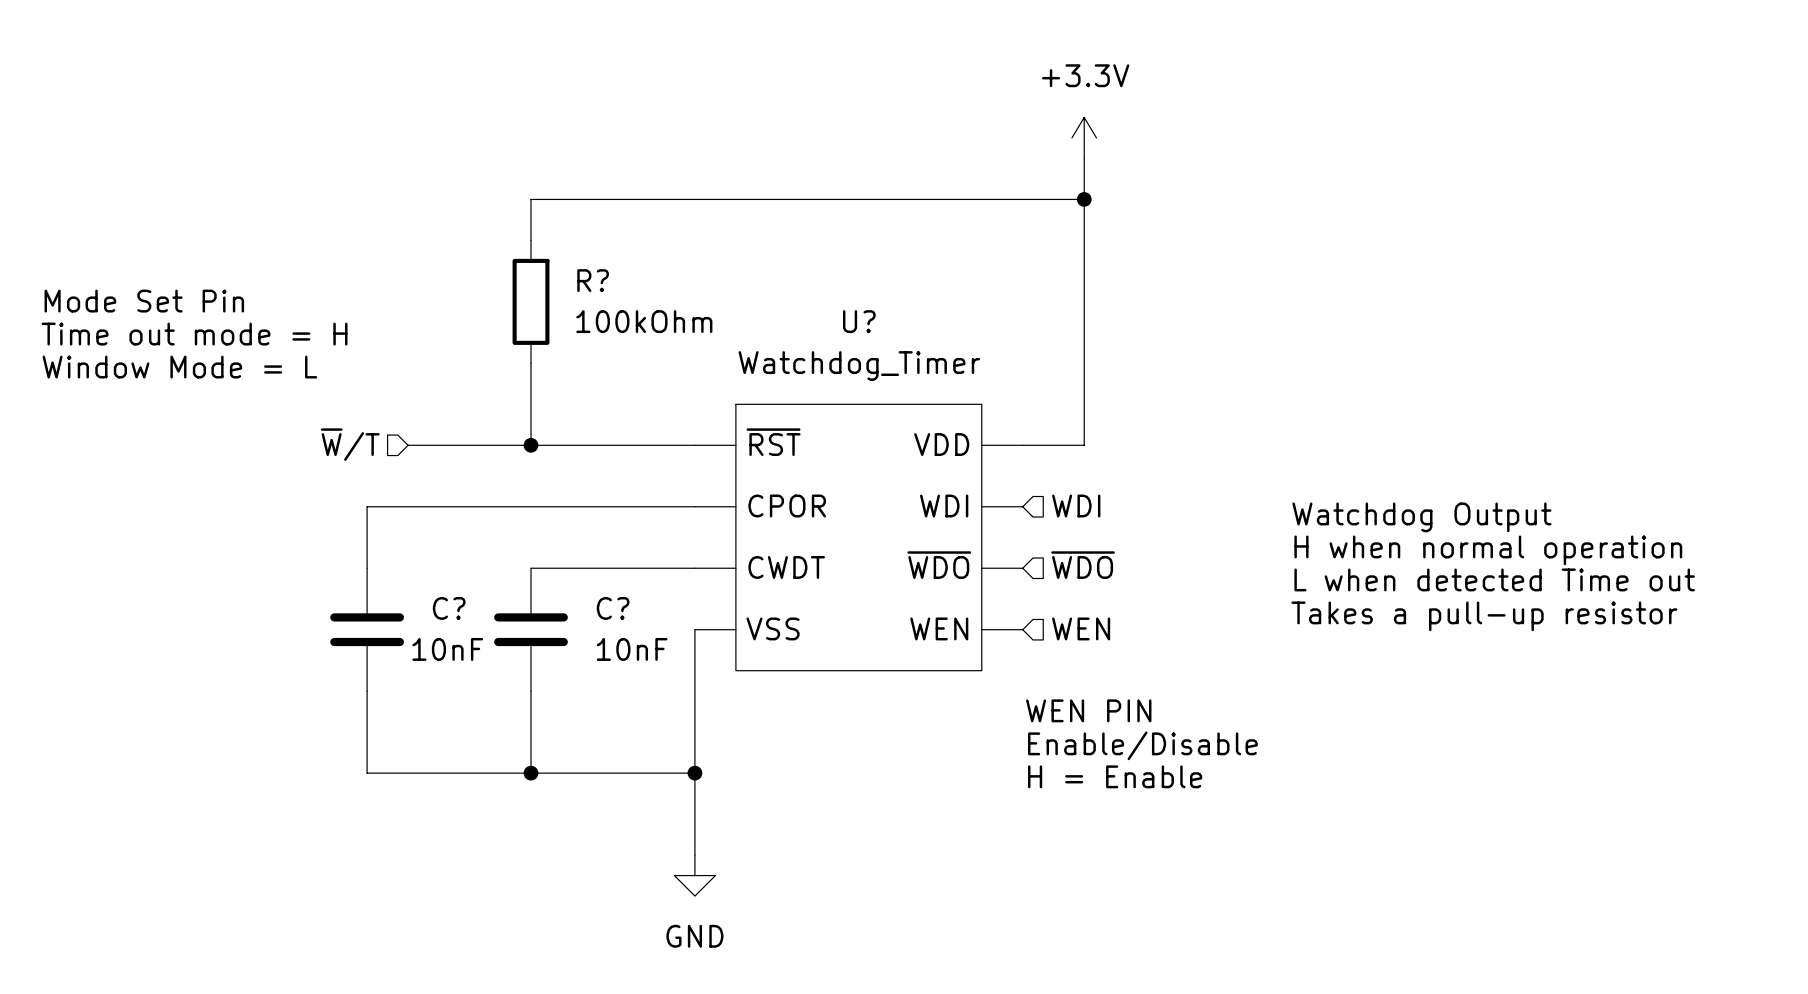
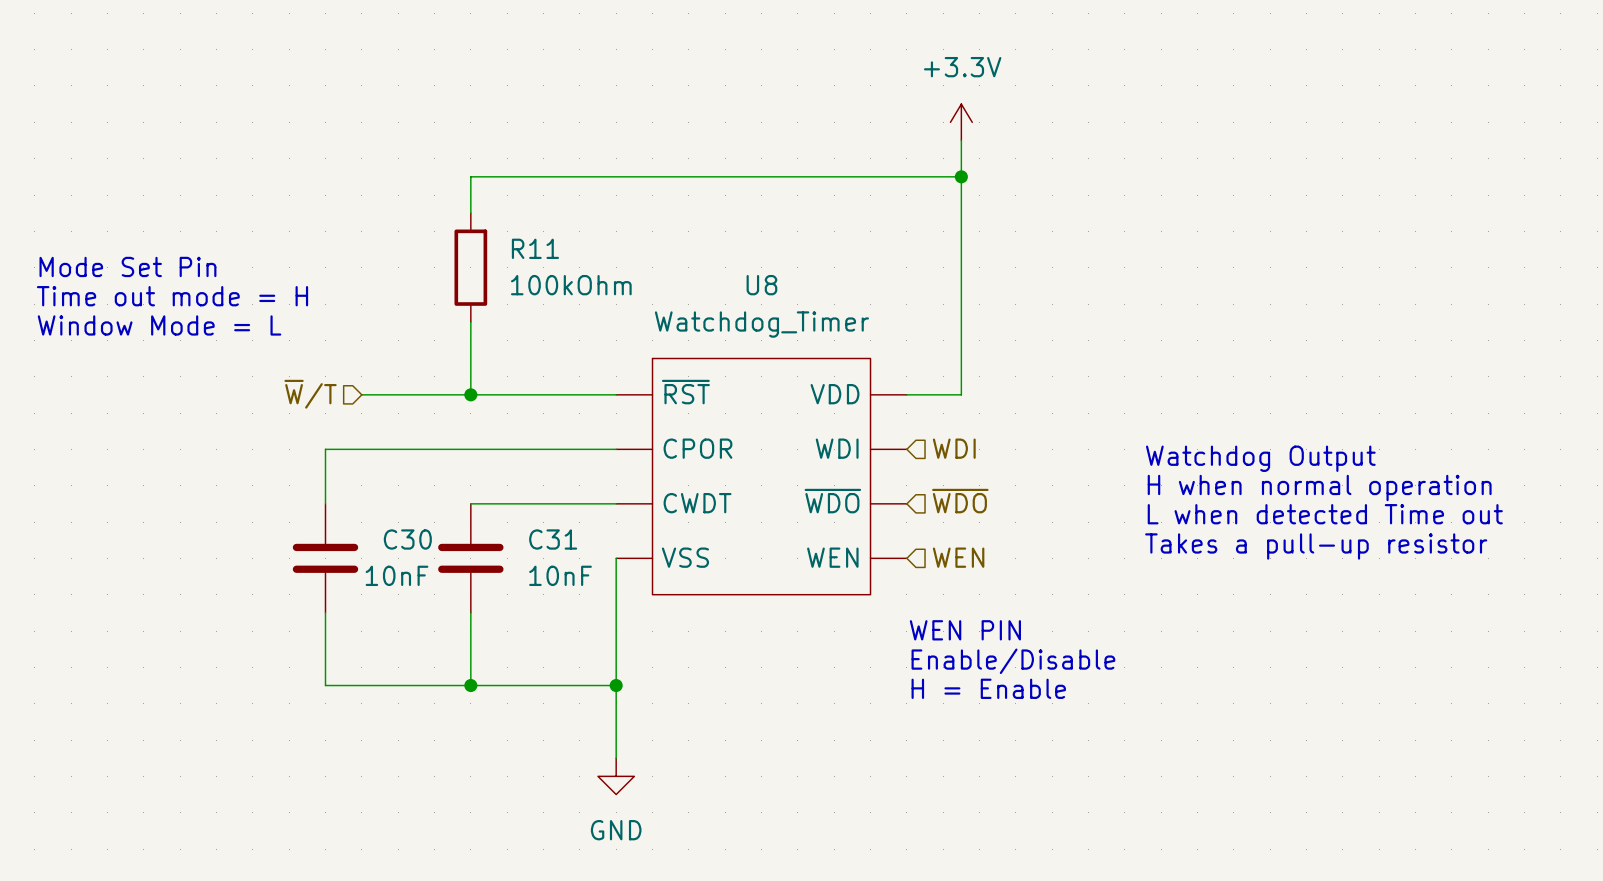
R? name: R? (593, 280) -> R11 (535, 248)
U? name: U? (859, 321) -> U8 (761, 285)
C? name: C? (449, 608) -> C30 (407, 539)
C? name: C? (613, 608) -> C31 (553, 539)

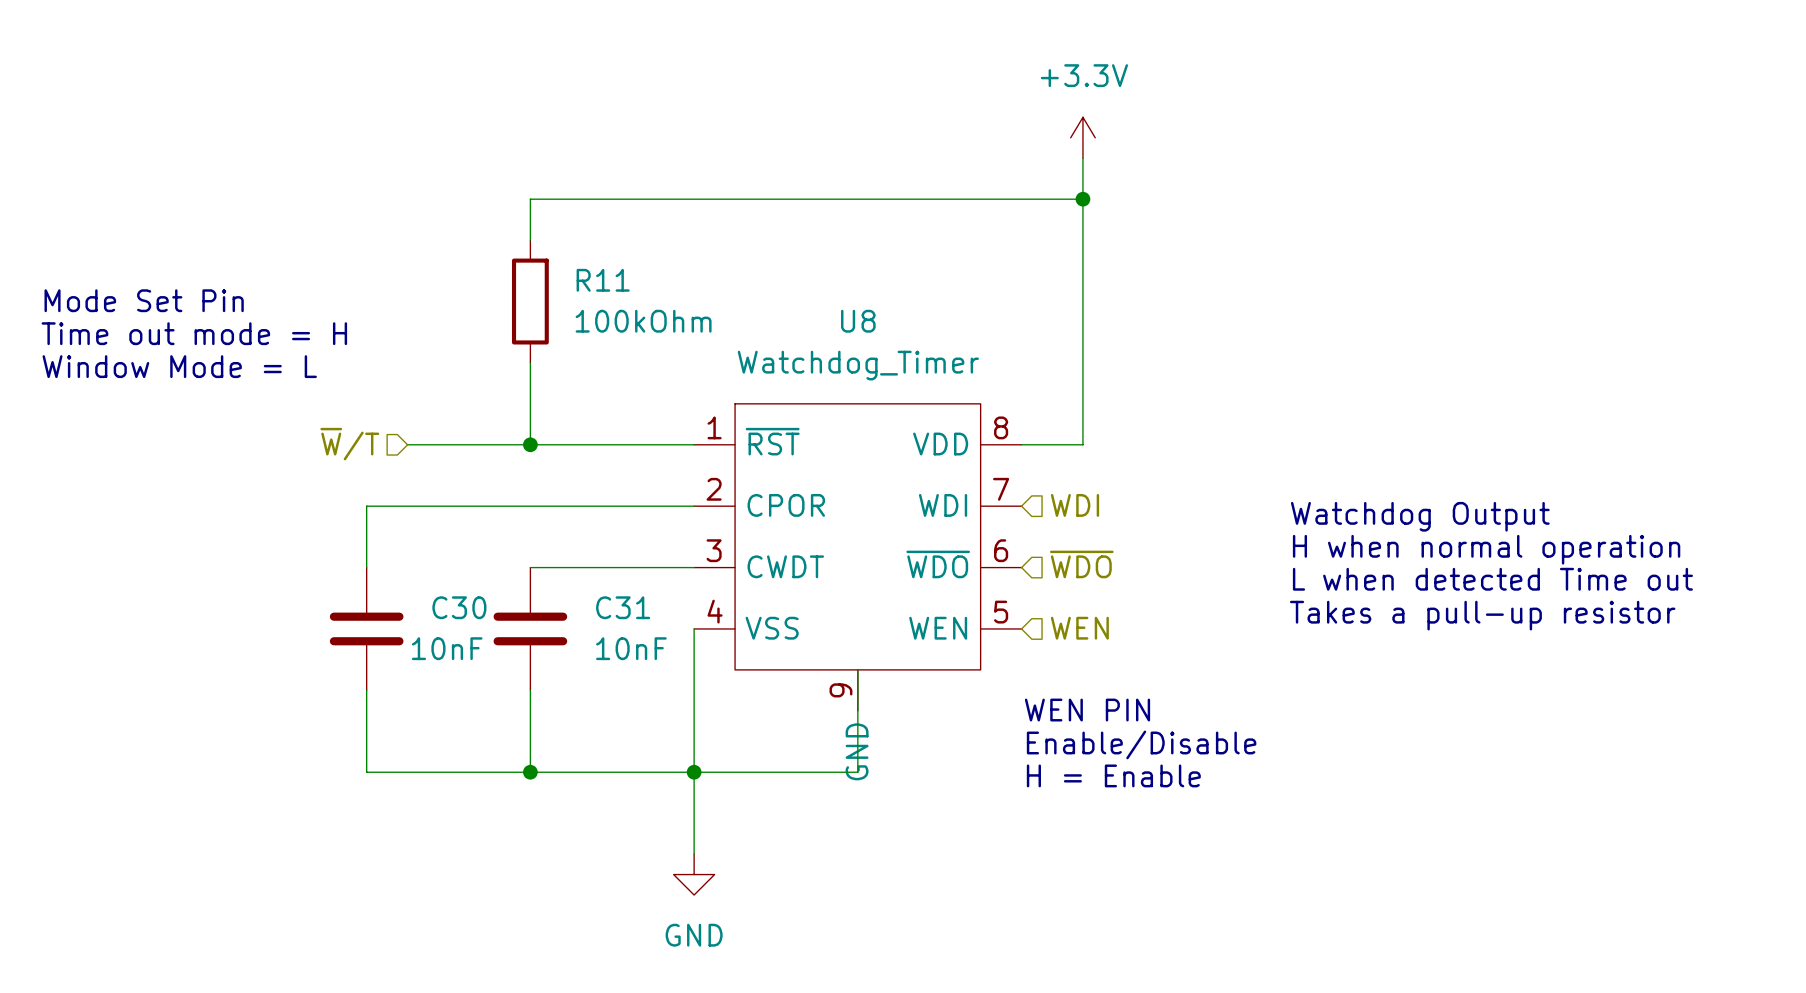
U8 symbol: [616, 358, 907, 595] -> [694, 403, 1022, 711]
wire: none -> (857, 669) (857, 772) (694, 772)

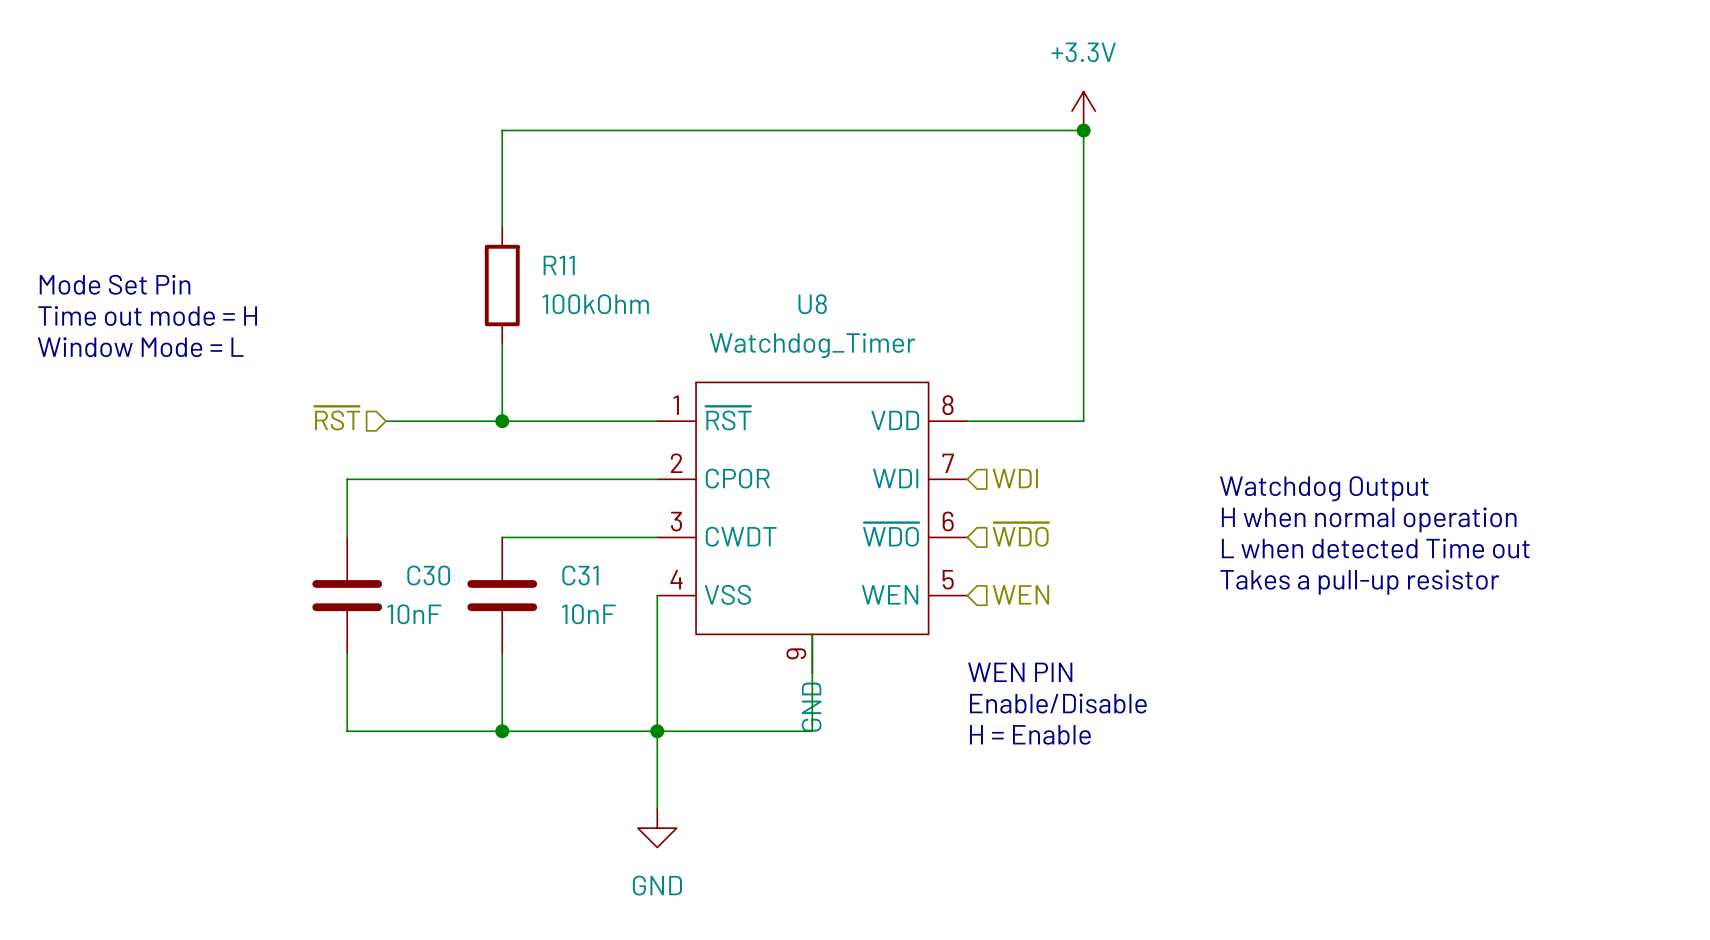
power symbol position: +3.3V (1082, 137) -> +3.3V (1083, 111)
wire: (1082, 158) (1082, 444) -> none
wire: (530, 199) (1082, 199) -> (502, 188) (502, 130) (1083, 130) (1083, 421) (1025, 421)
junction position: (1082, 199) -> (1083, 130)
hierarchical label: ~{W}/T (349, 444) -> ~{RST} (337, 418)

